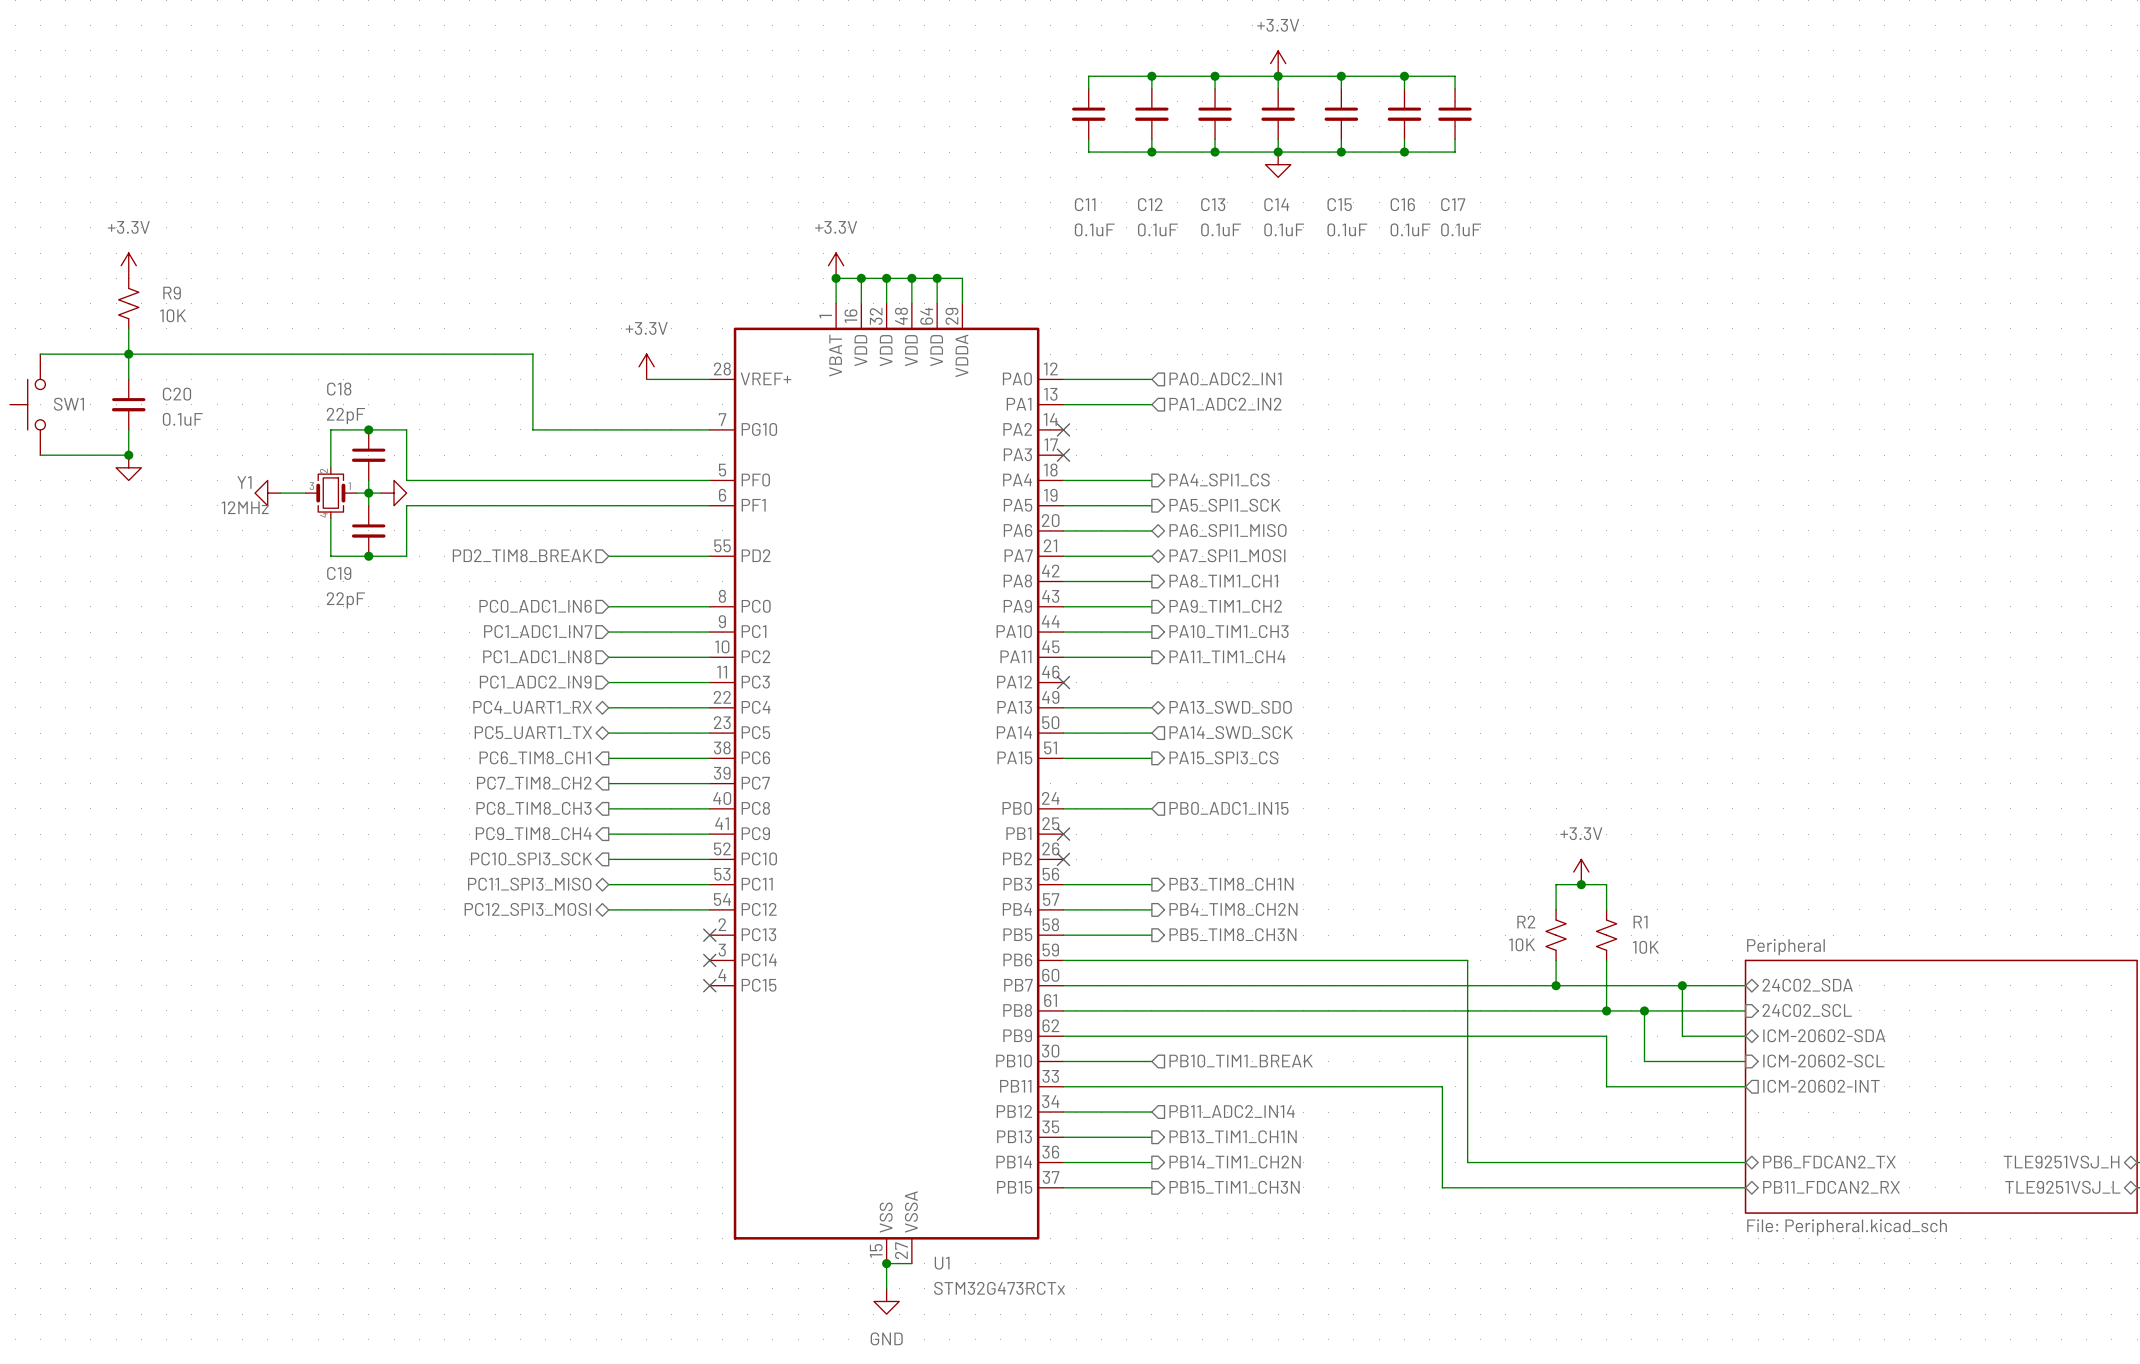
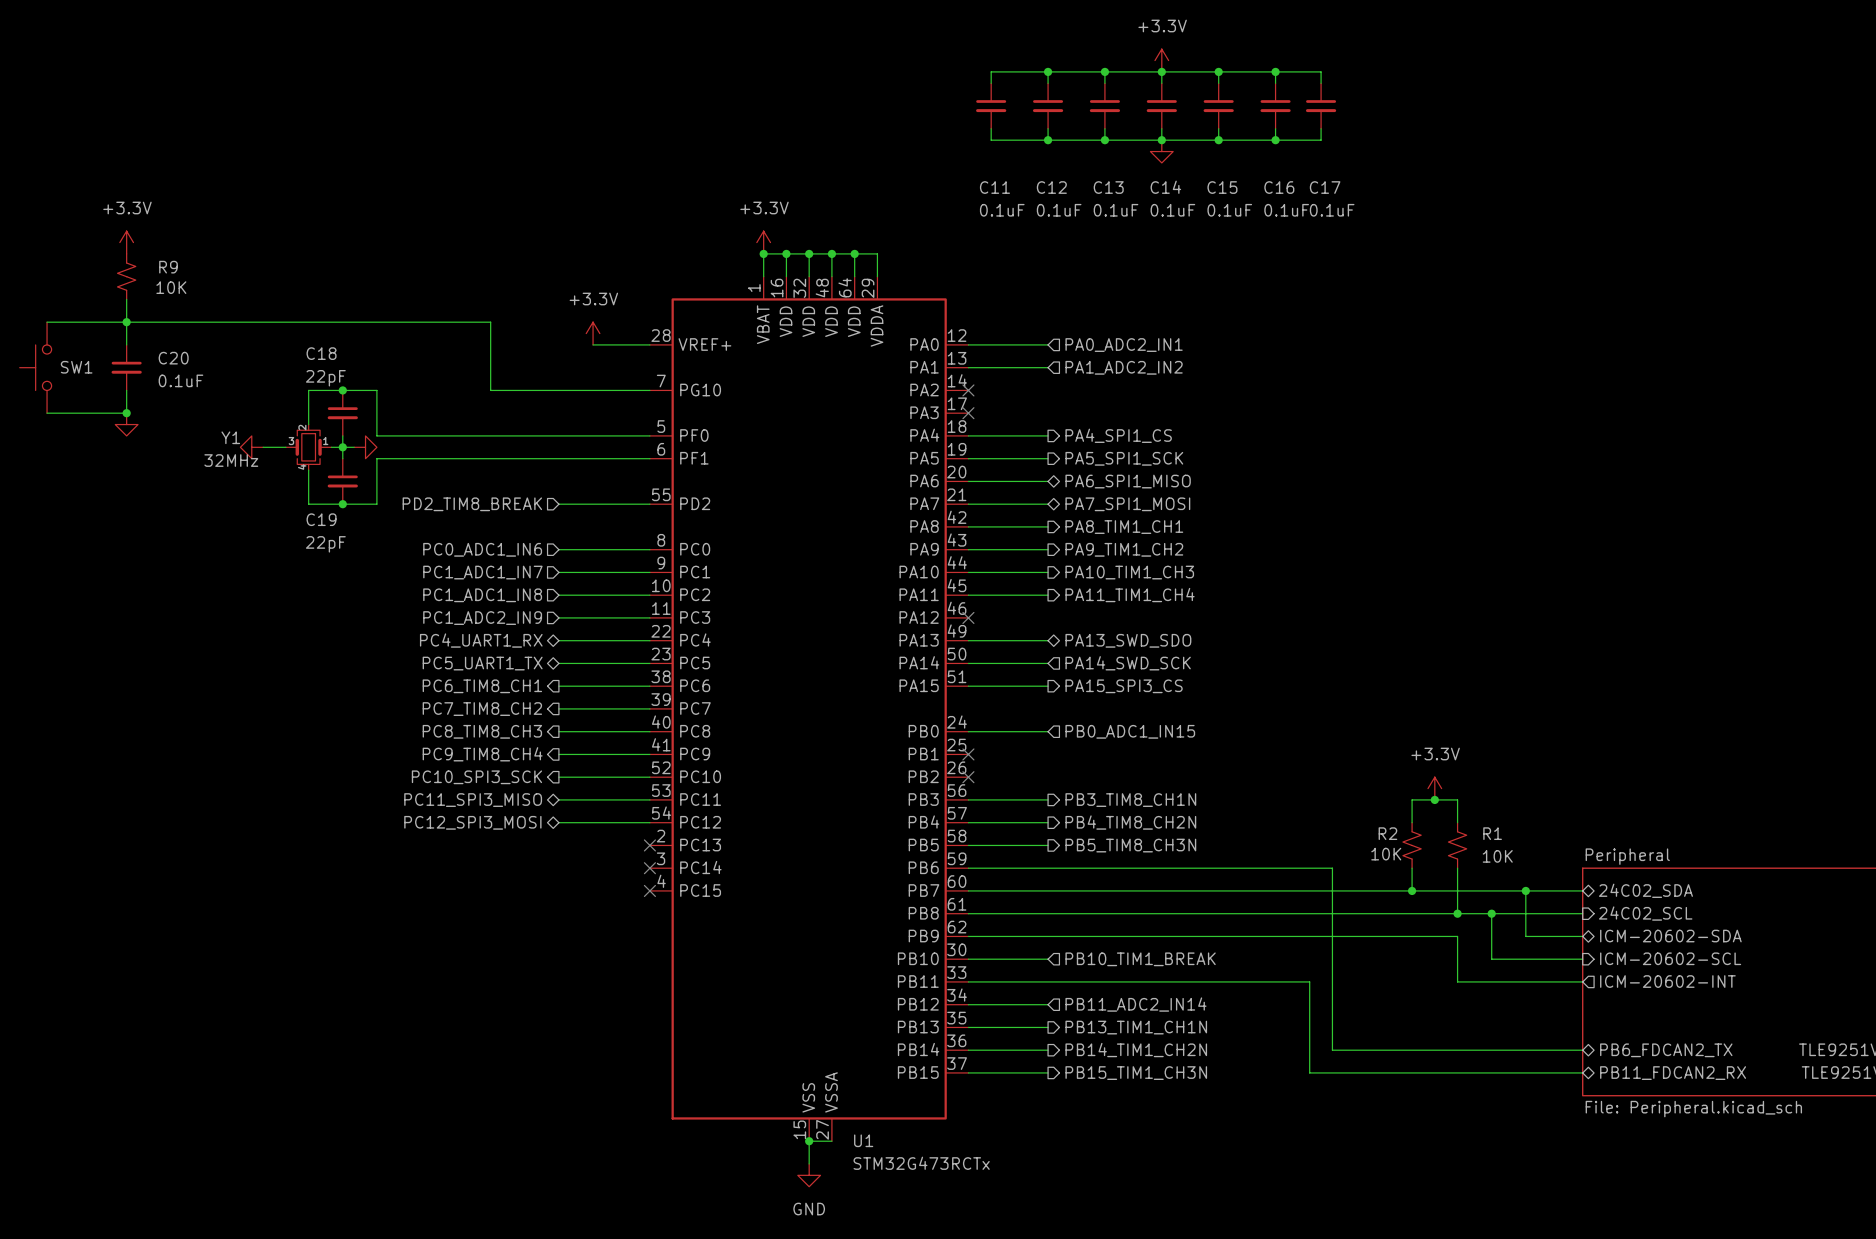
Y1 value: 12MHz (245, 507) -> 32MHz (231, 460)

